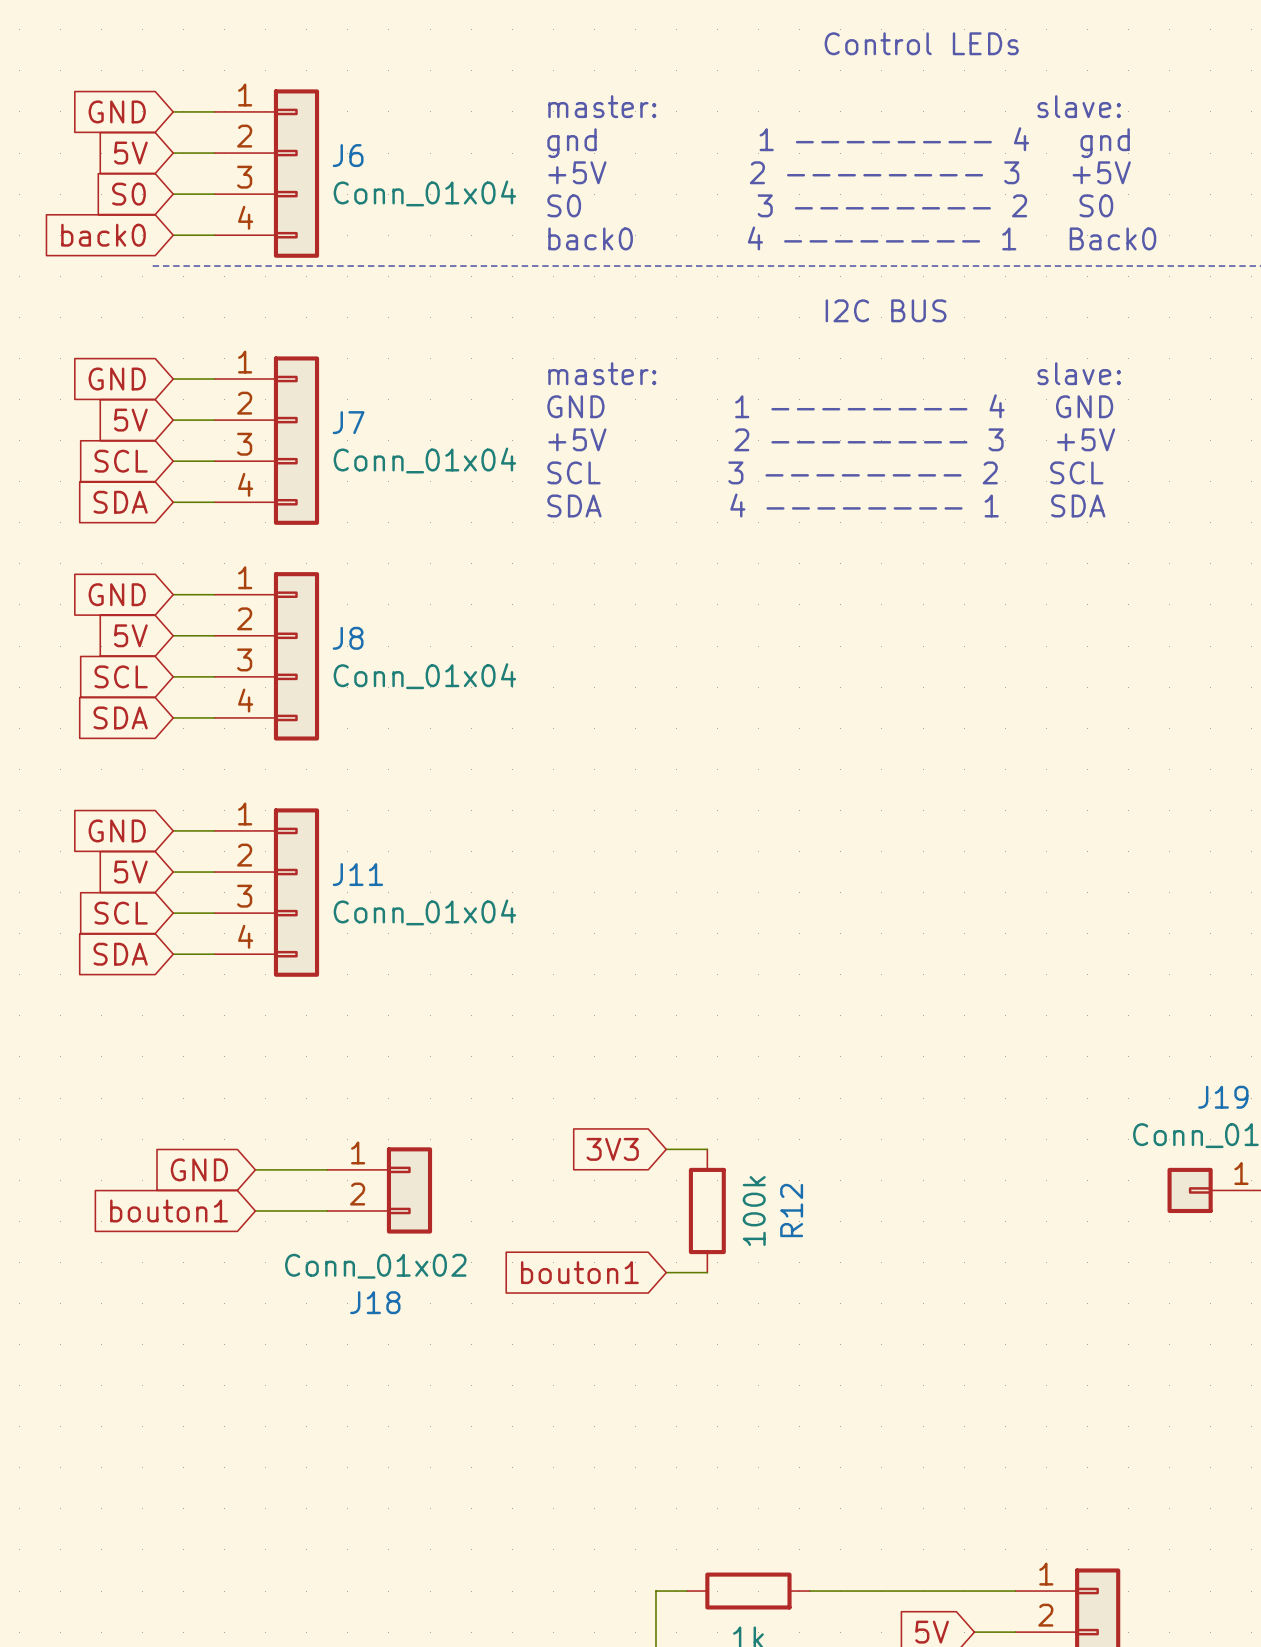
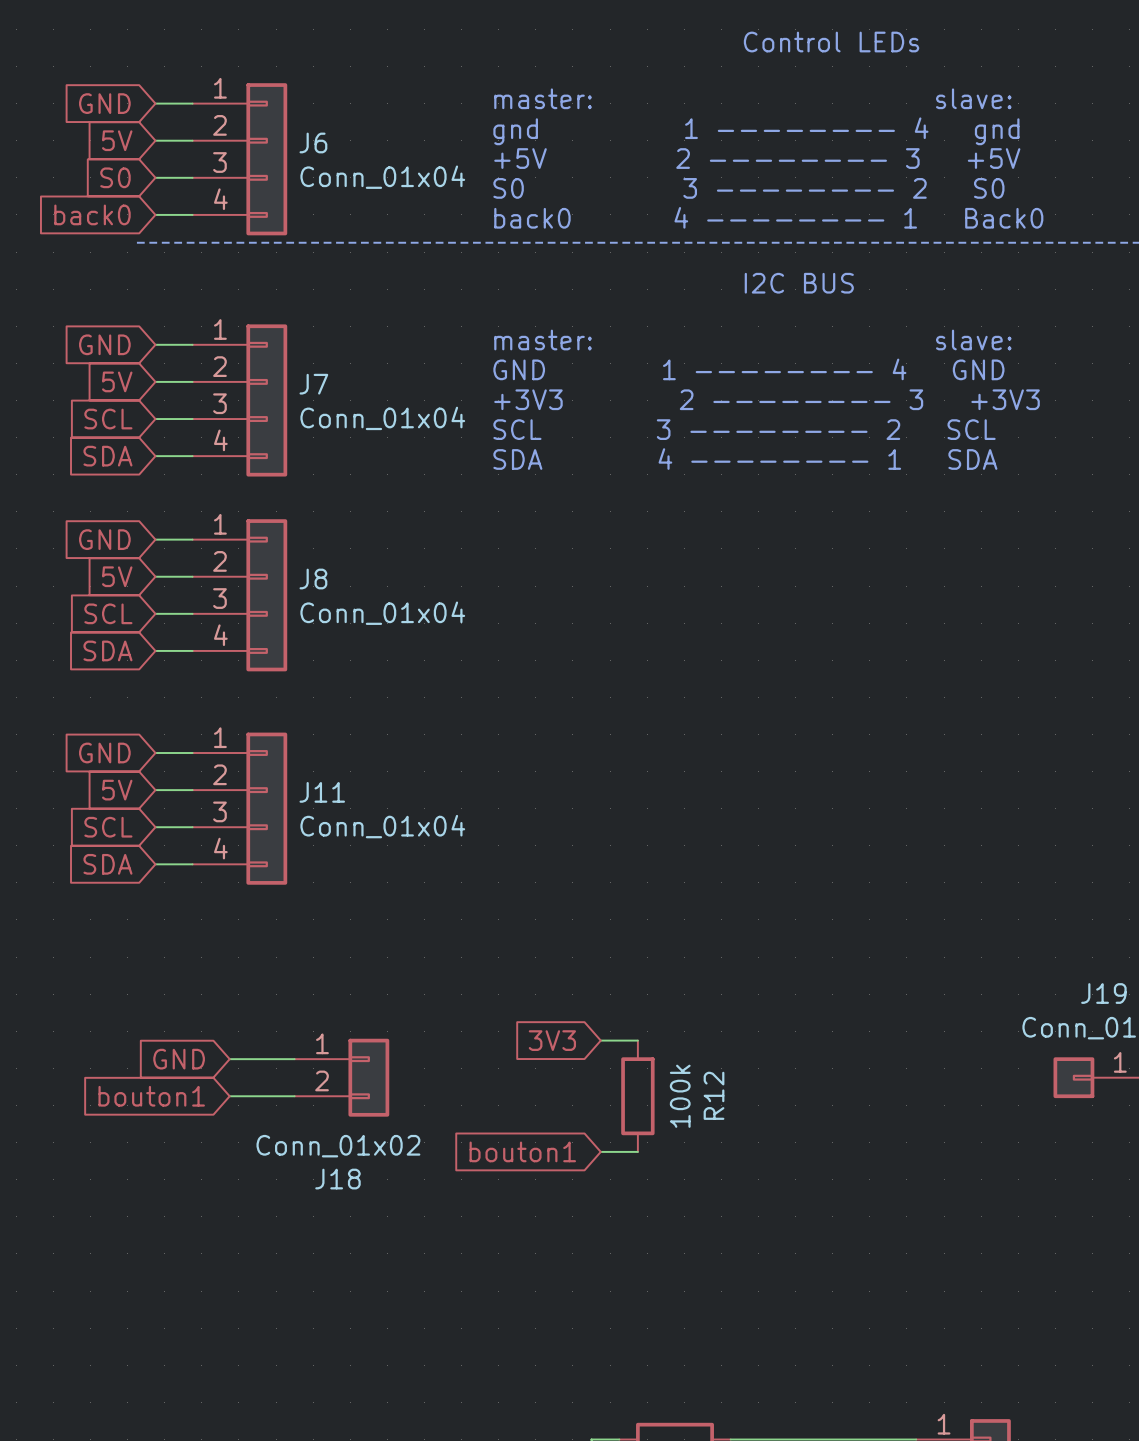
text: +5V 2 -------- 3 +5V (831, 439) -> +3V3 2 -------- 3 +3V3 (767, 399)

